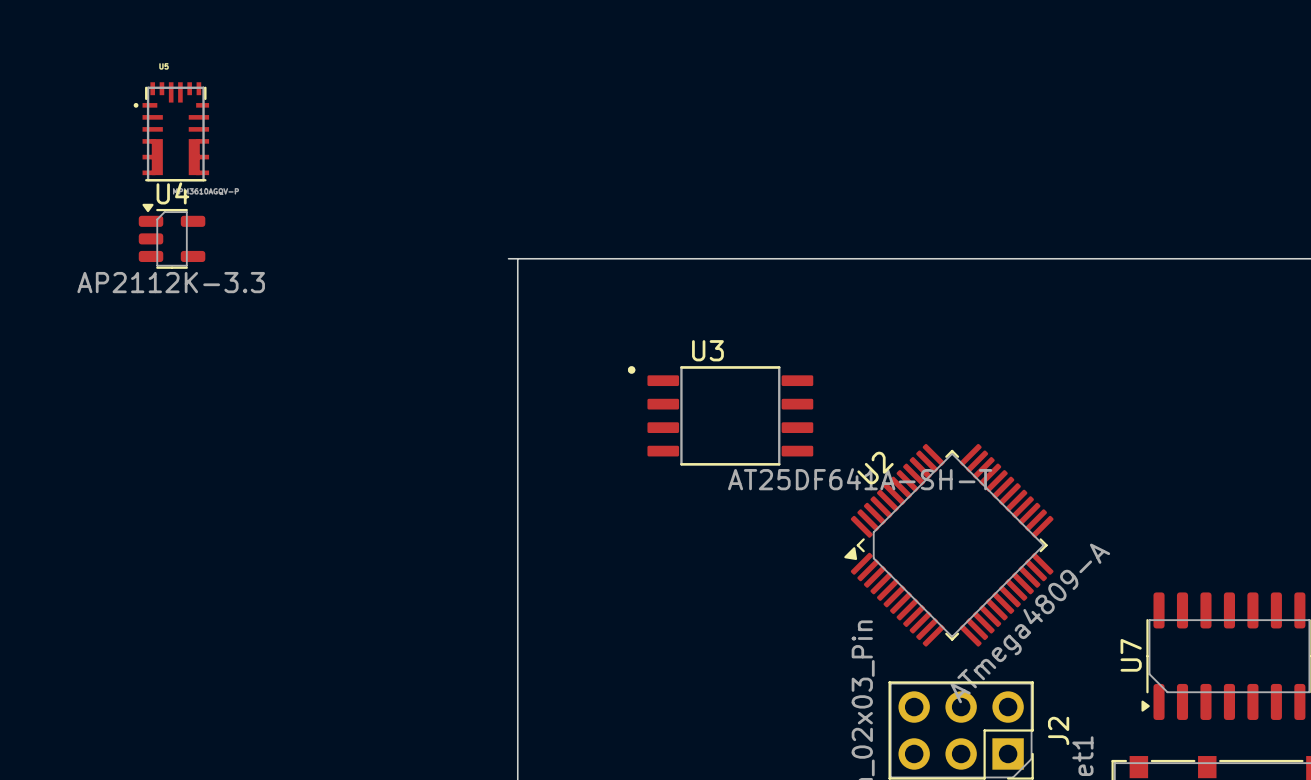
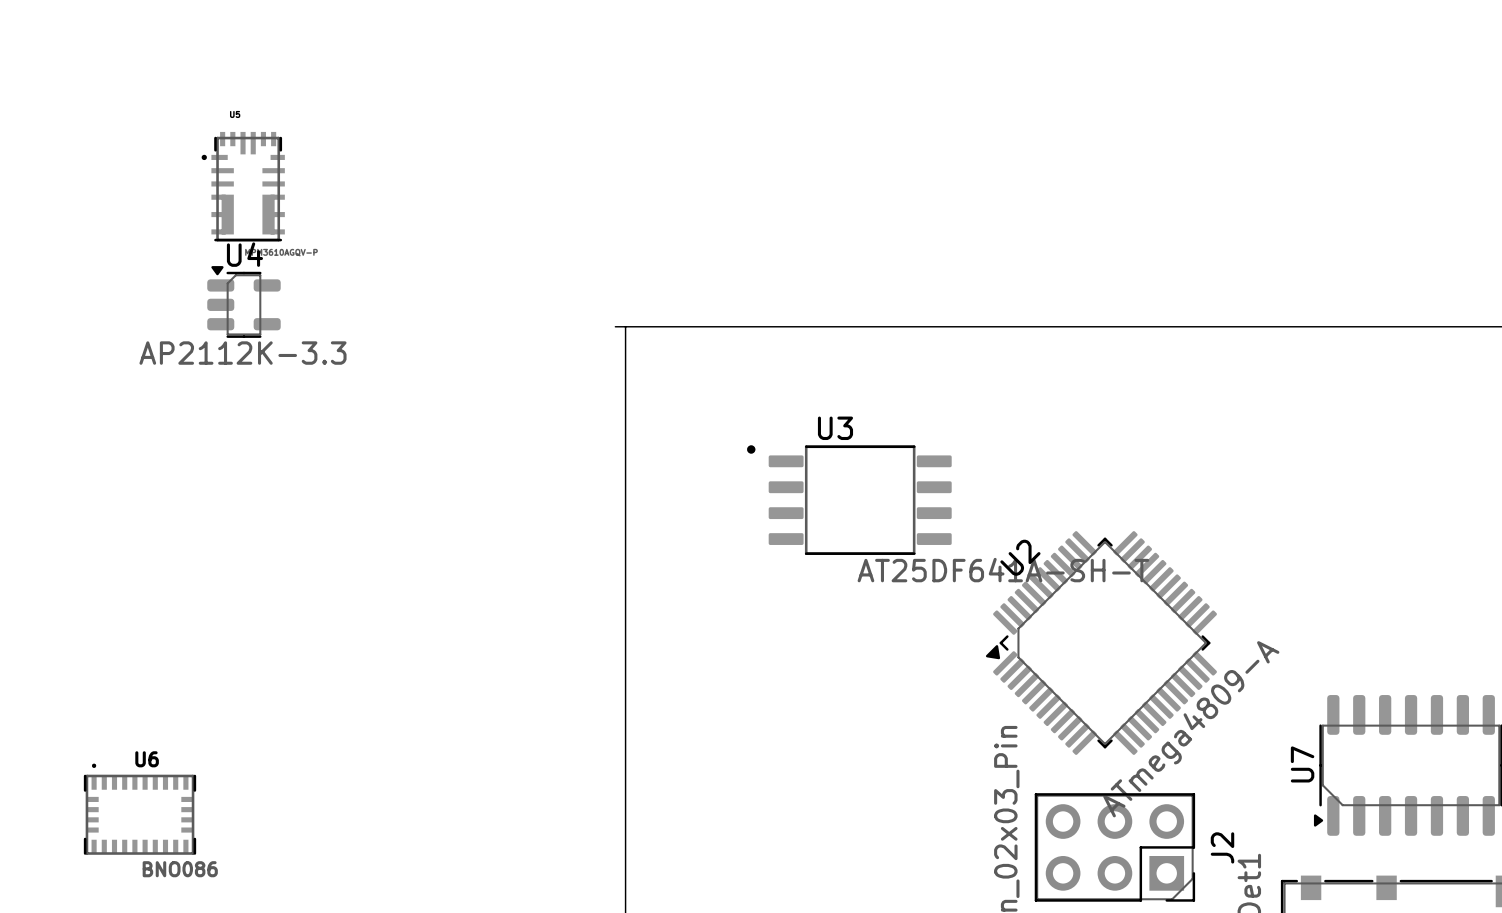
U6: none -> BNO086 (140, 809)

